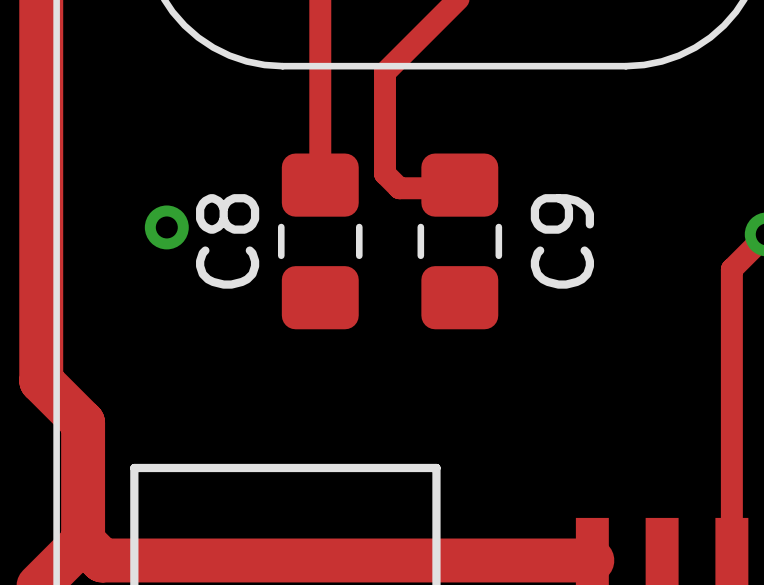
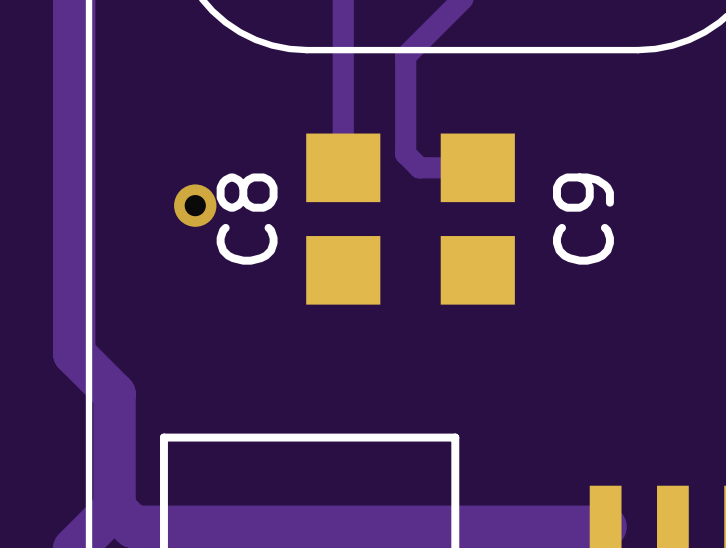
C8 footprint: [277, 153, 363, 330] -> [306, 133, 381, 305]
C9 footprint: [417, 153, 503, 330] -> [440, 133, 515, 305]

